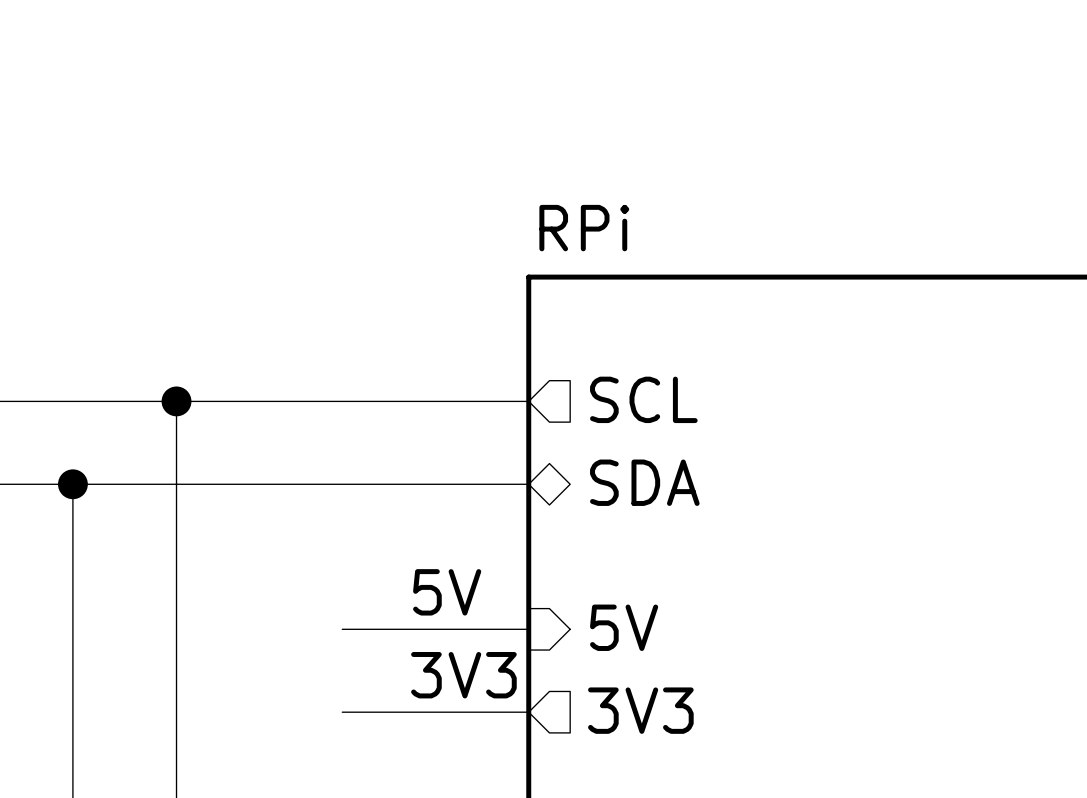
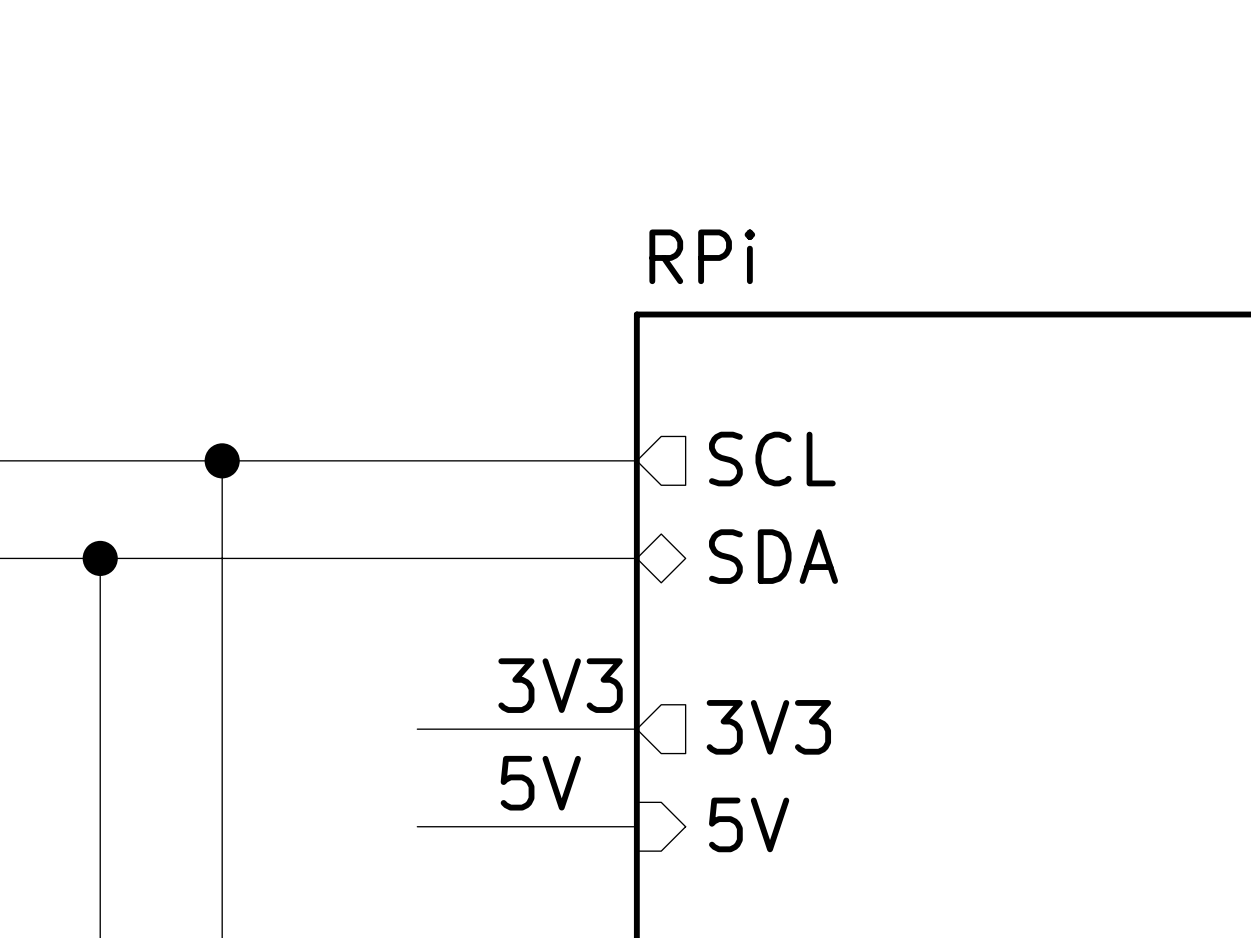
label: 5V (447, 592) -> 3V3 (560, 685)
sheet pin shape: input (624, 627) -> output (768, 727)
sheet pin: 5V (624, 627) -> 3V3 (768, 727)
label: 3V3 (463, 675) -> 5V (540, 783)
sheet pin shape: output (640, 710) -> input (749, 824)
sheet pin: 3V3 (640, 710) -> 5V (749, 824)

